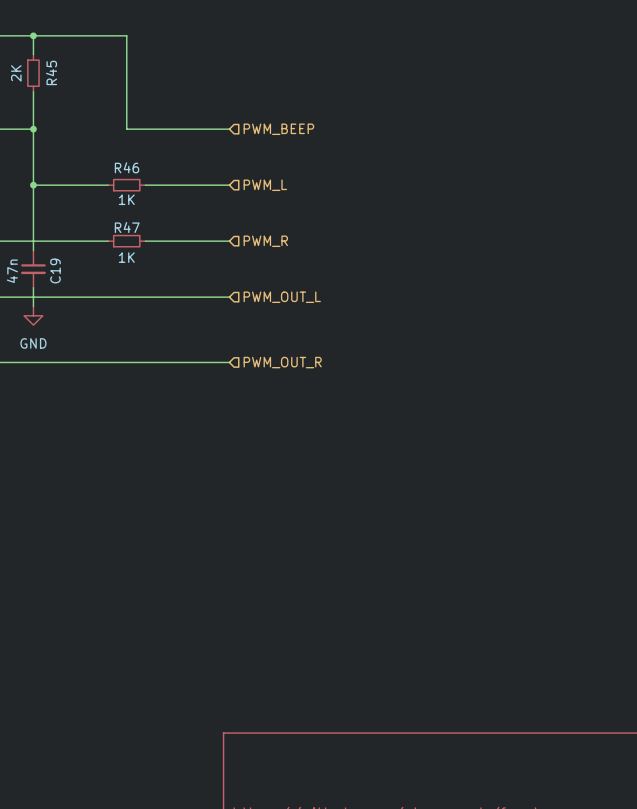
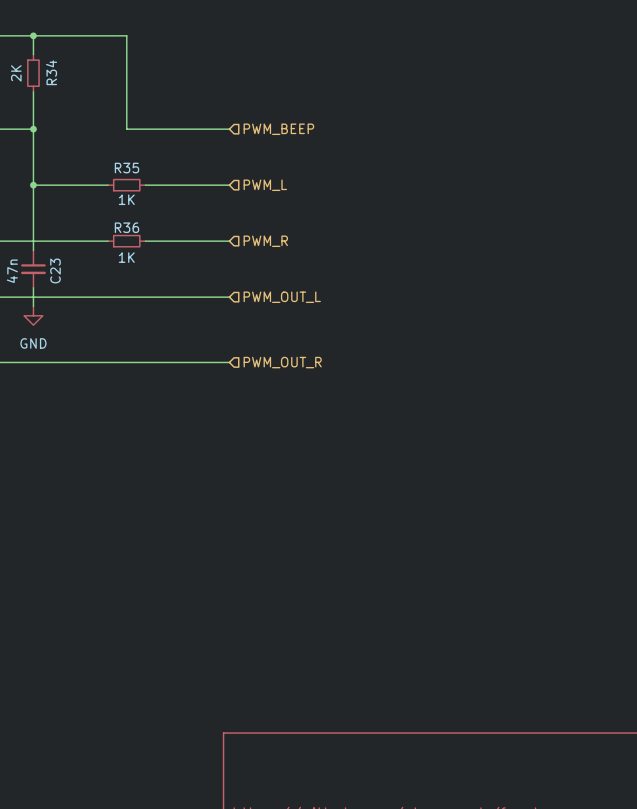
R45 name: R45 (51, 72) -> R34 (51, 72)
R46 name: R46 (126, 167) -> R35 (126, 168)
R47 name: R47 (127, 227) -> R36 (126, 227)
C19 name: C19 (55, 271) -> C23 (55, 271)

